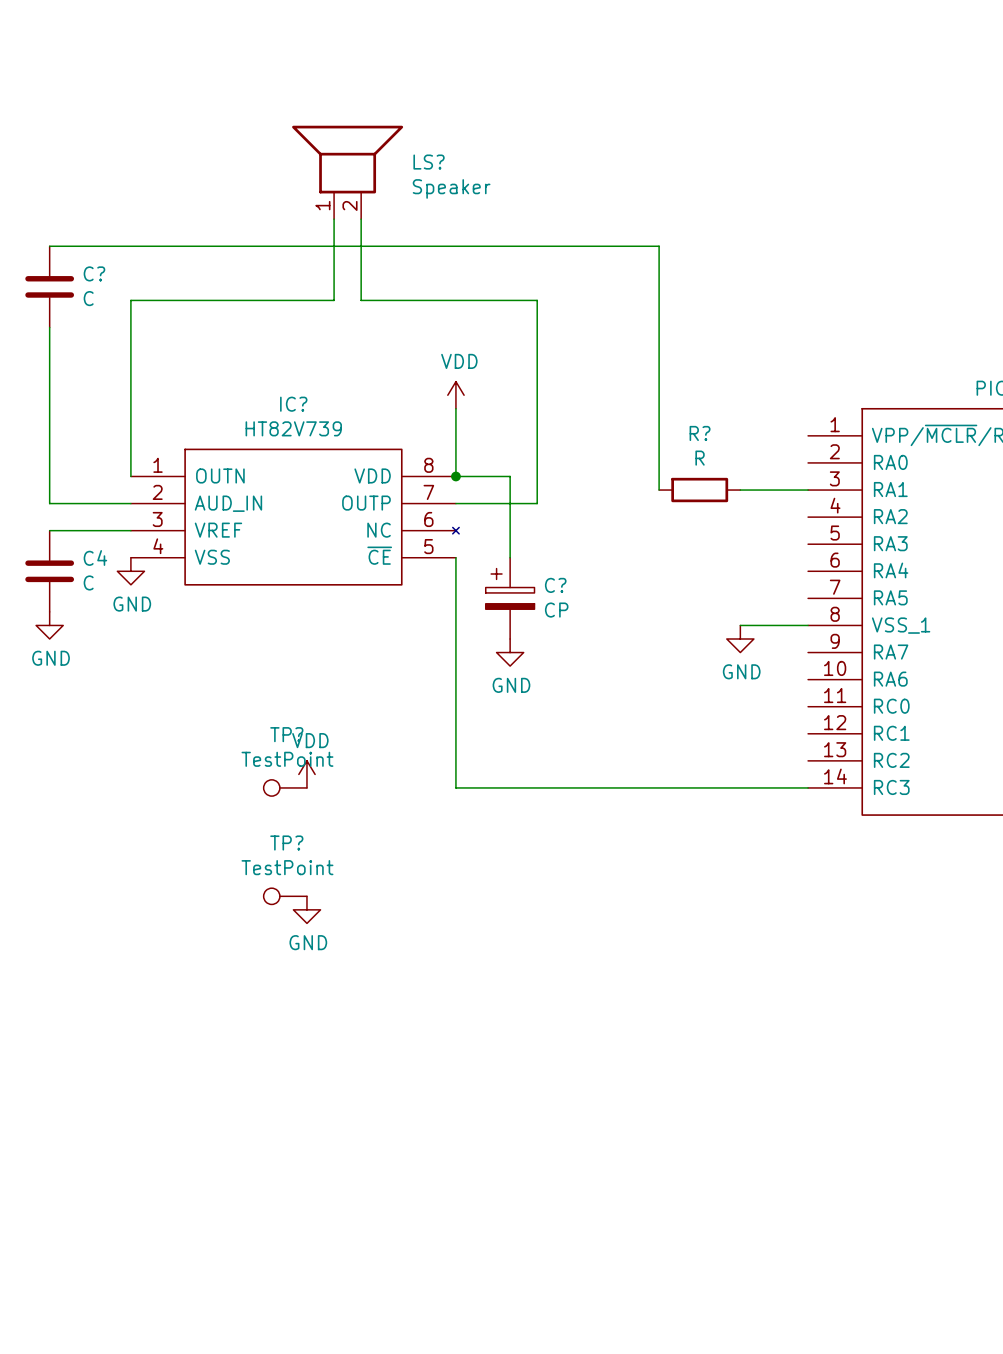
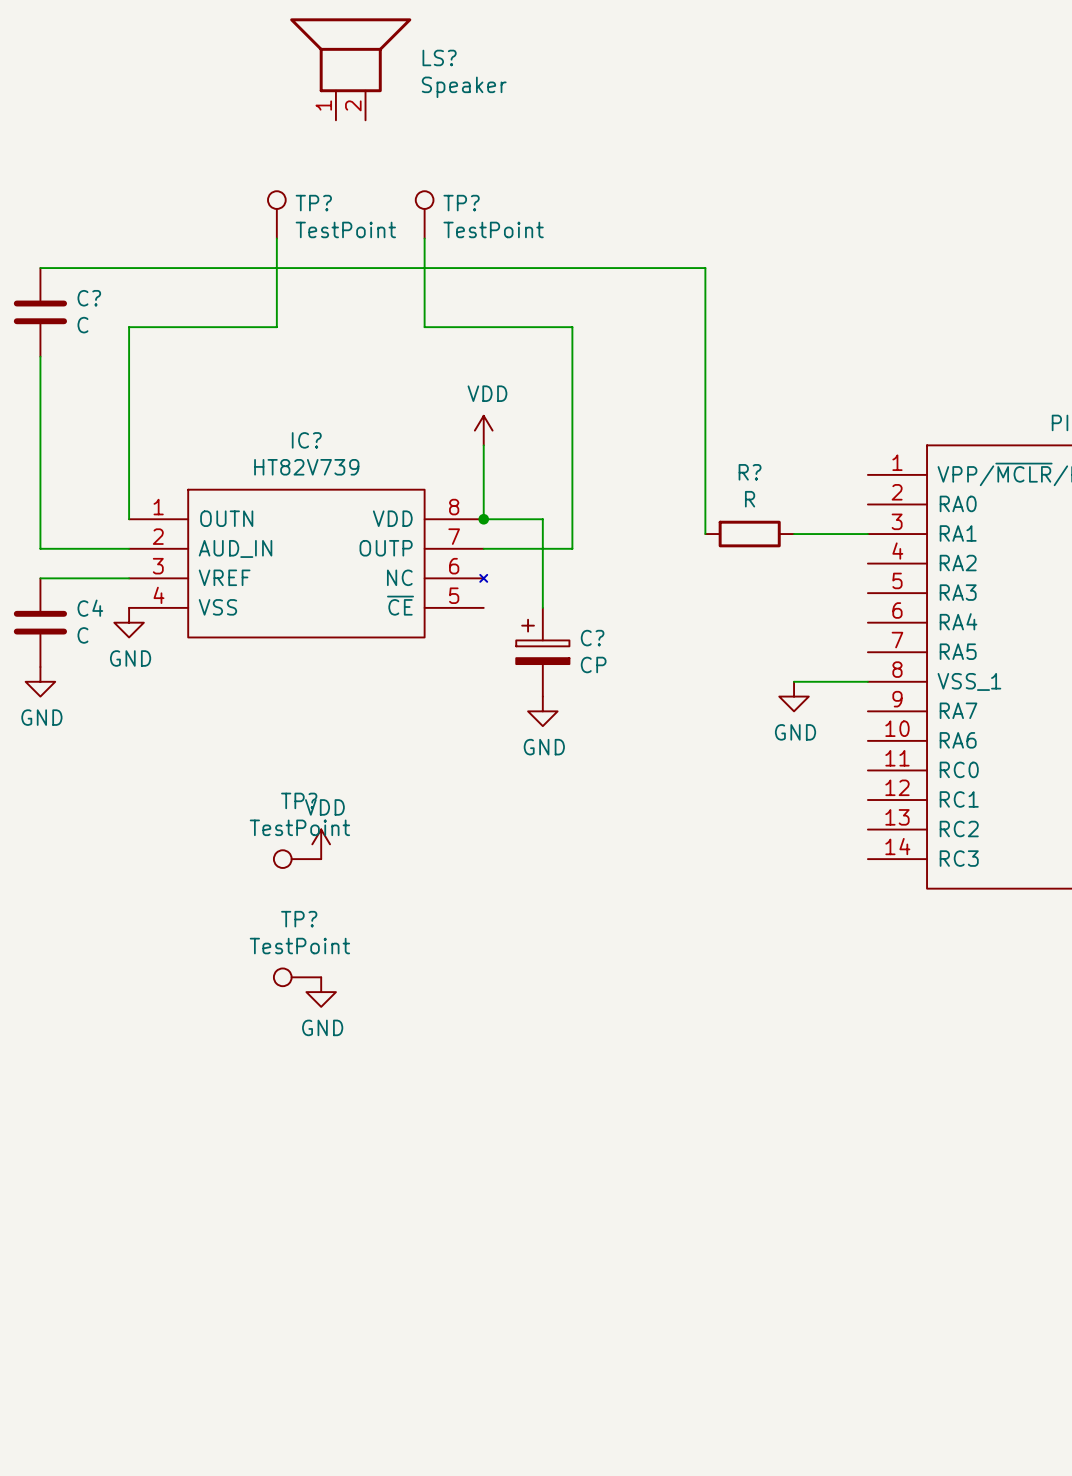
LS? position: (347, 172) -> (350, 69)
TP?: none -> TestPoint (276, 214)
TP?: none -> TestPoint (424, 214)
wire: (334, 219) (334, 300) (266, 300) -> (276, 238) (276, 327)
wire: (361, 219) (361, 300) (401, 300) -> (424, 238) (424, 327)
wire: (455, 557) (455, 787) (808, 787) -> none

